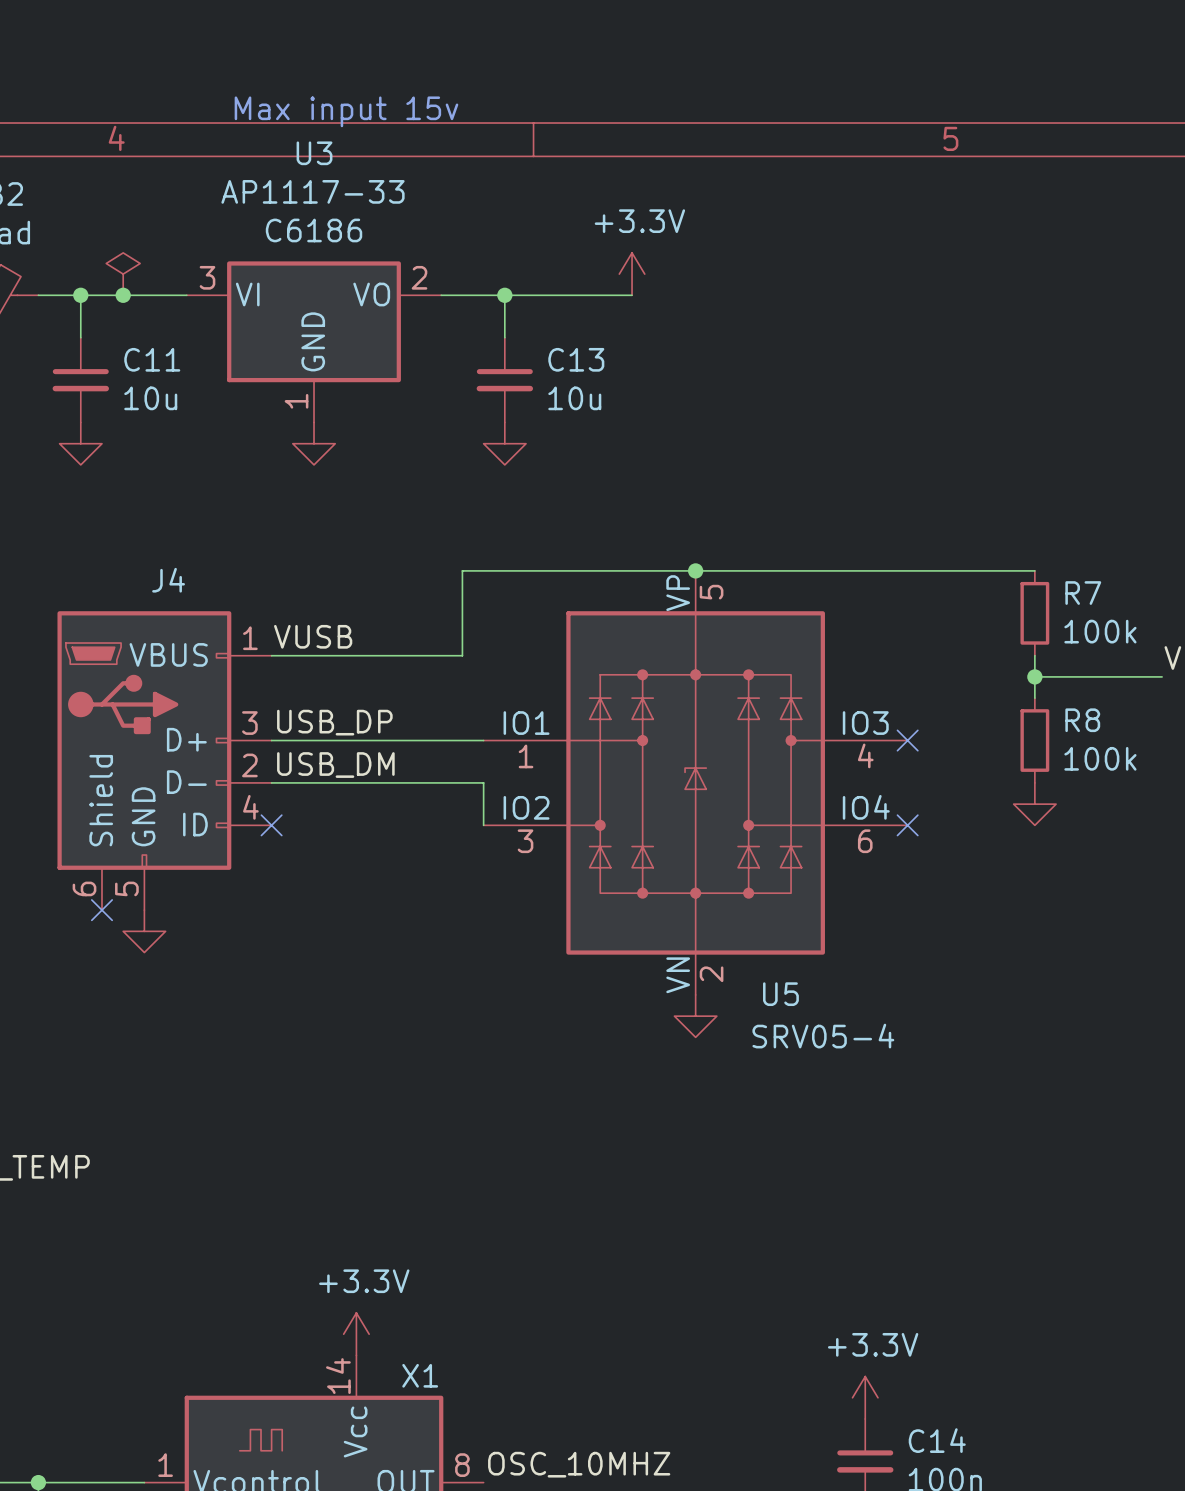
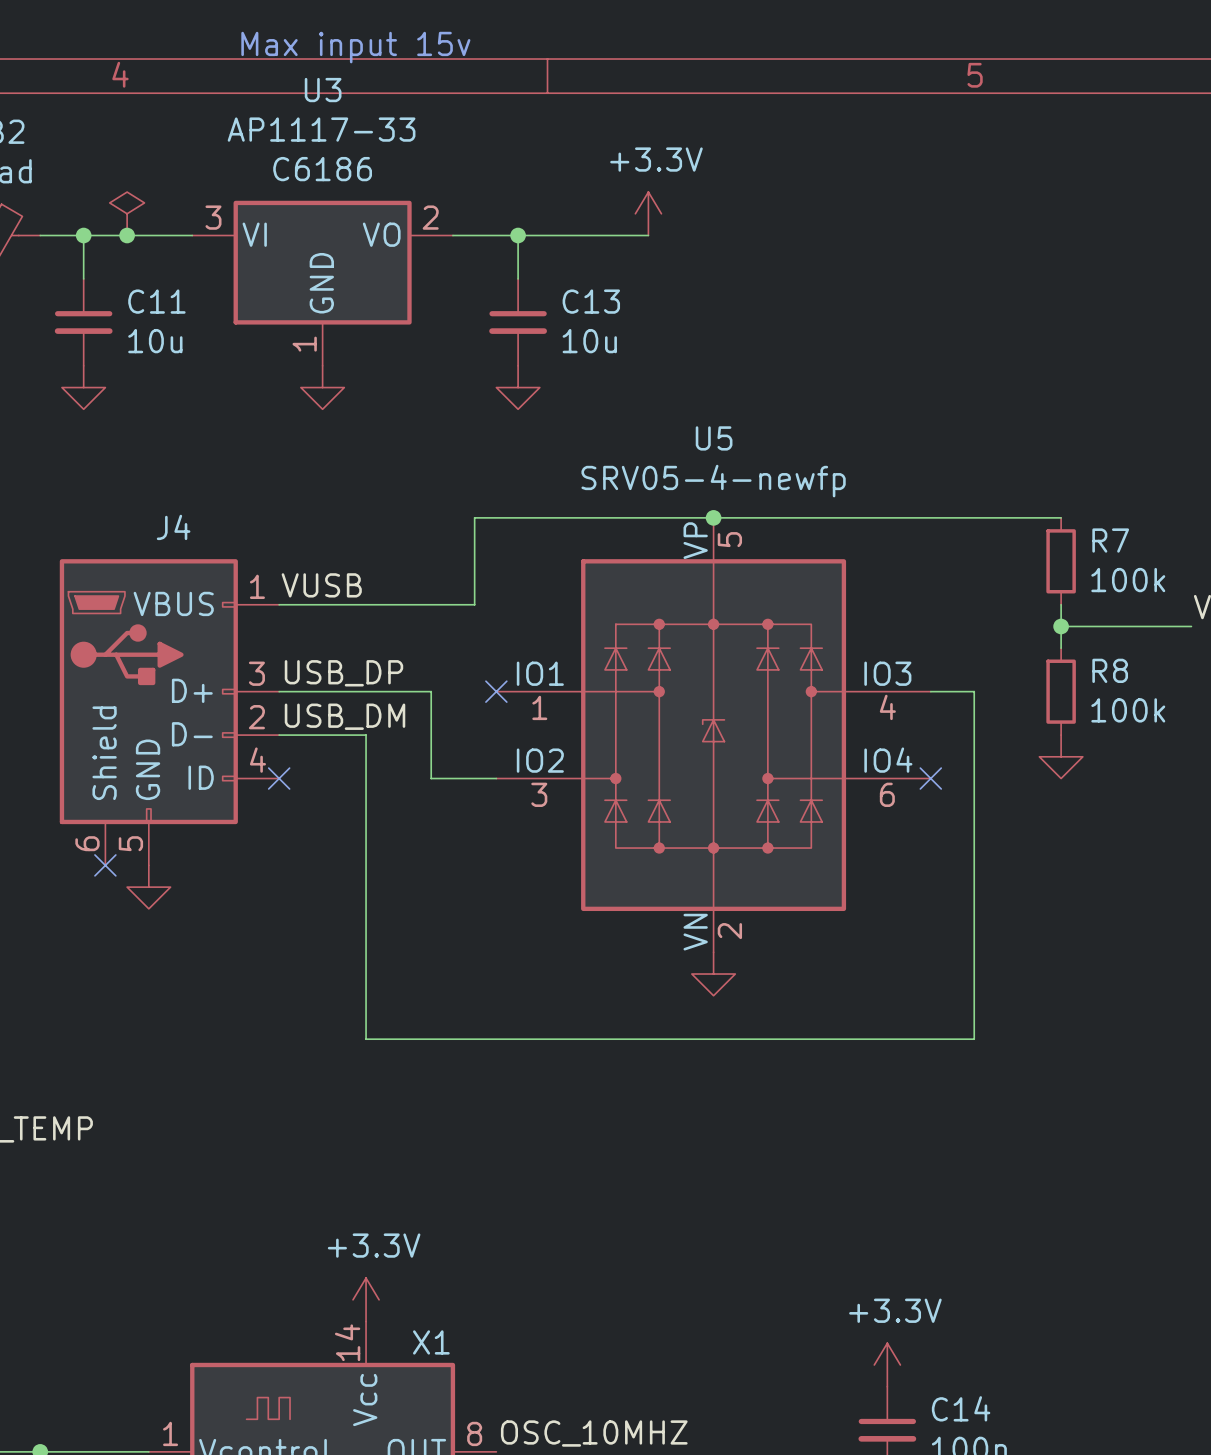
wire: (420, 740) (483, 740) -> none
no-connect mark: none -> (496, 691)
wire: none -> (930, 691) (974, 691) (974, 1039) (366, 1039) (366, 735)
no-connect mark: (907, 740) -> none
wire: (356, 782) (483, 782) (483, 825) -> (431, 691) (431, 778) (496, 778)
U5 name position: U5 (780, 994) -> U5 (714, 438)
U5 value: SRV05-4 (823, 1036) -> SRV05-4-newfp (713, 481)

